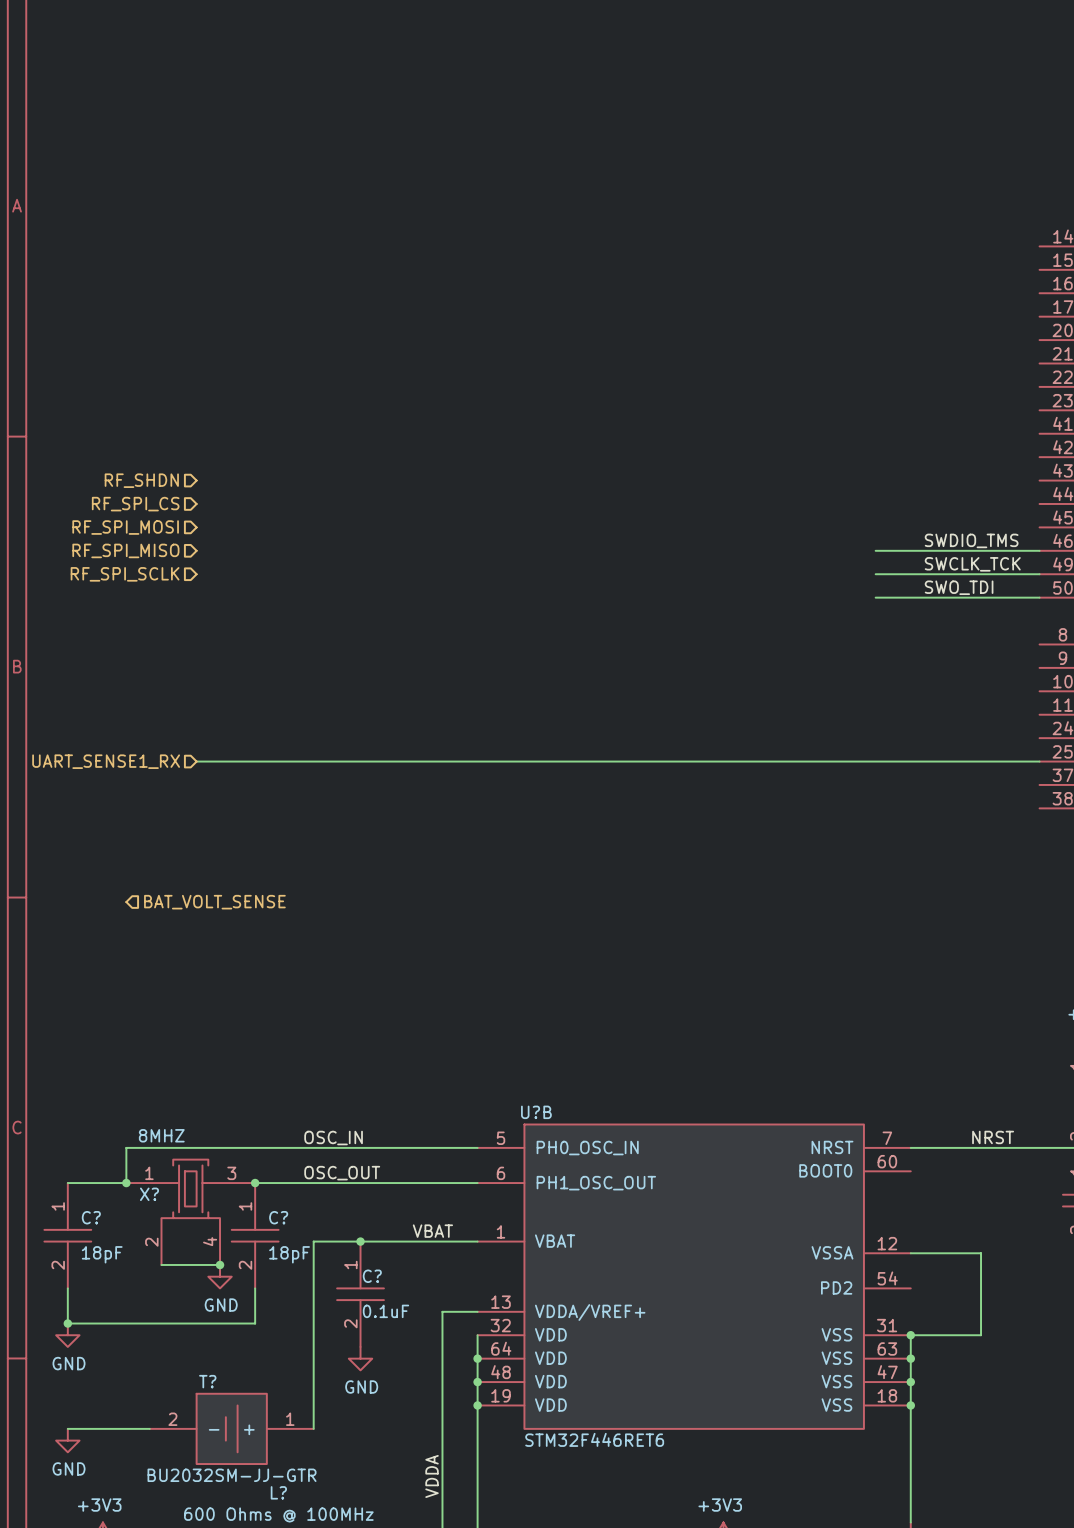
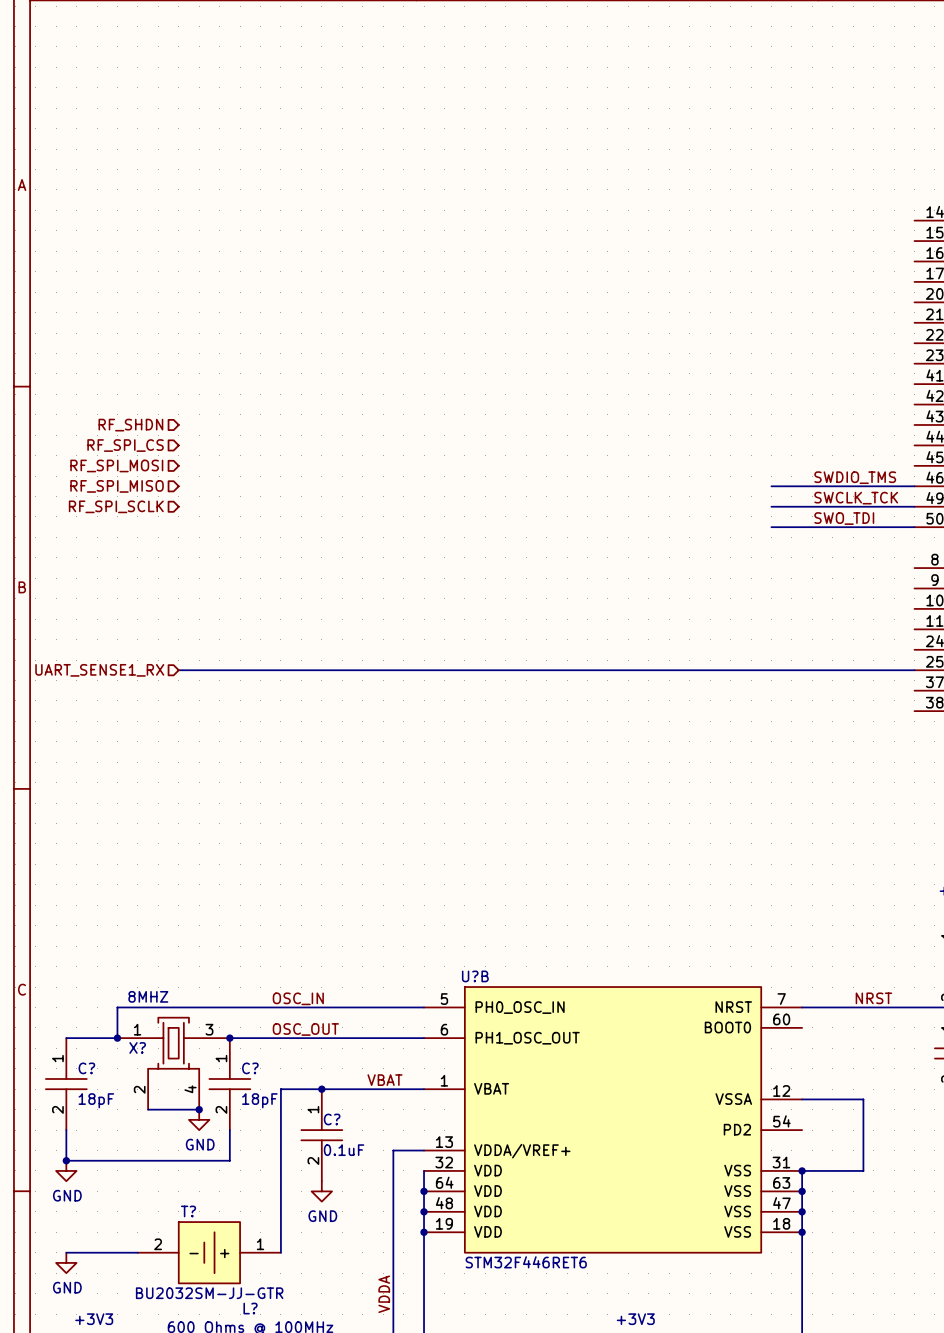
hierarchical label: BAT_VOLT_SENSE (214, 902) -> none

